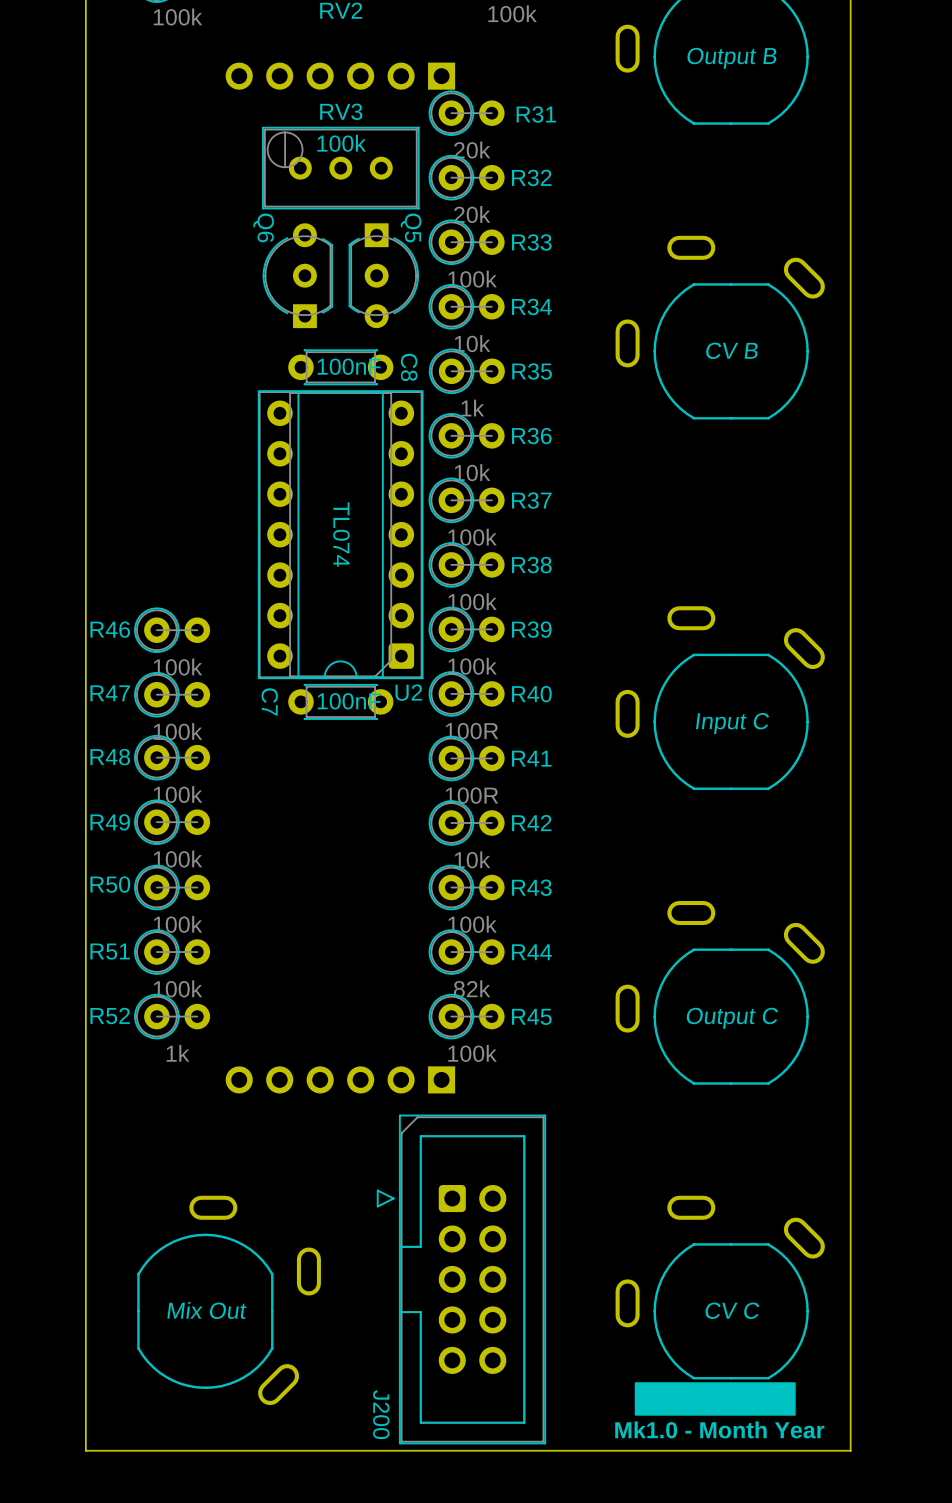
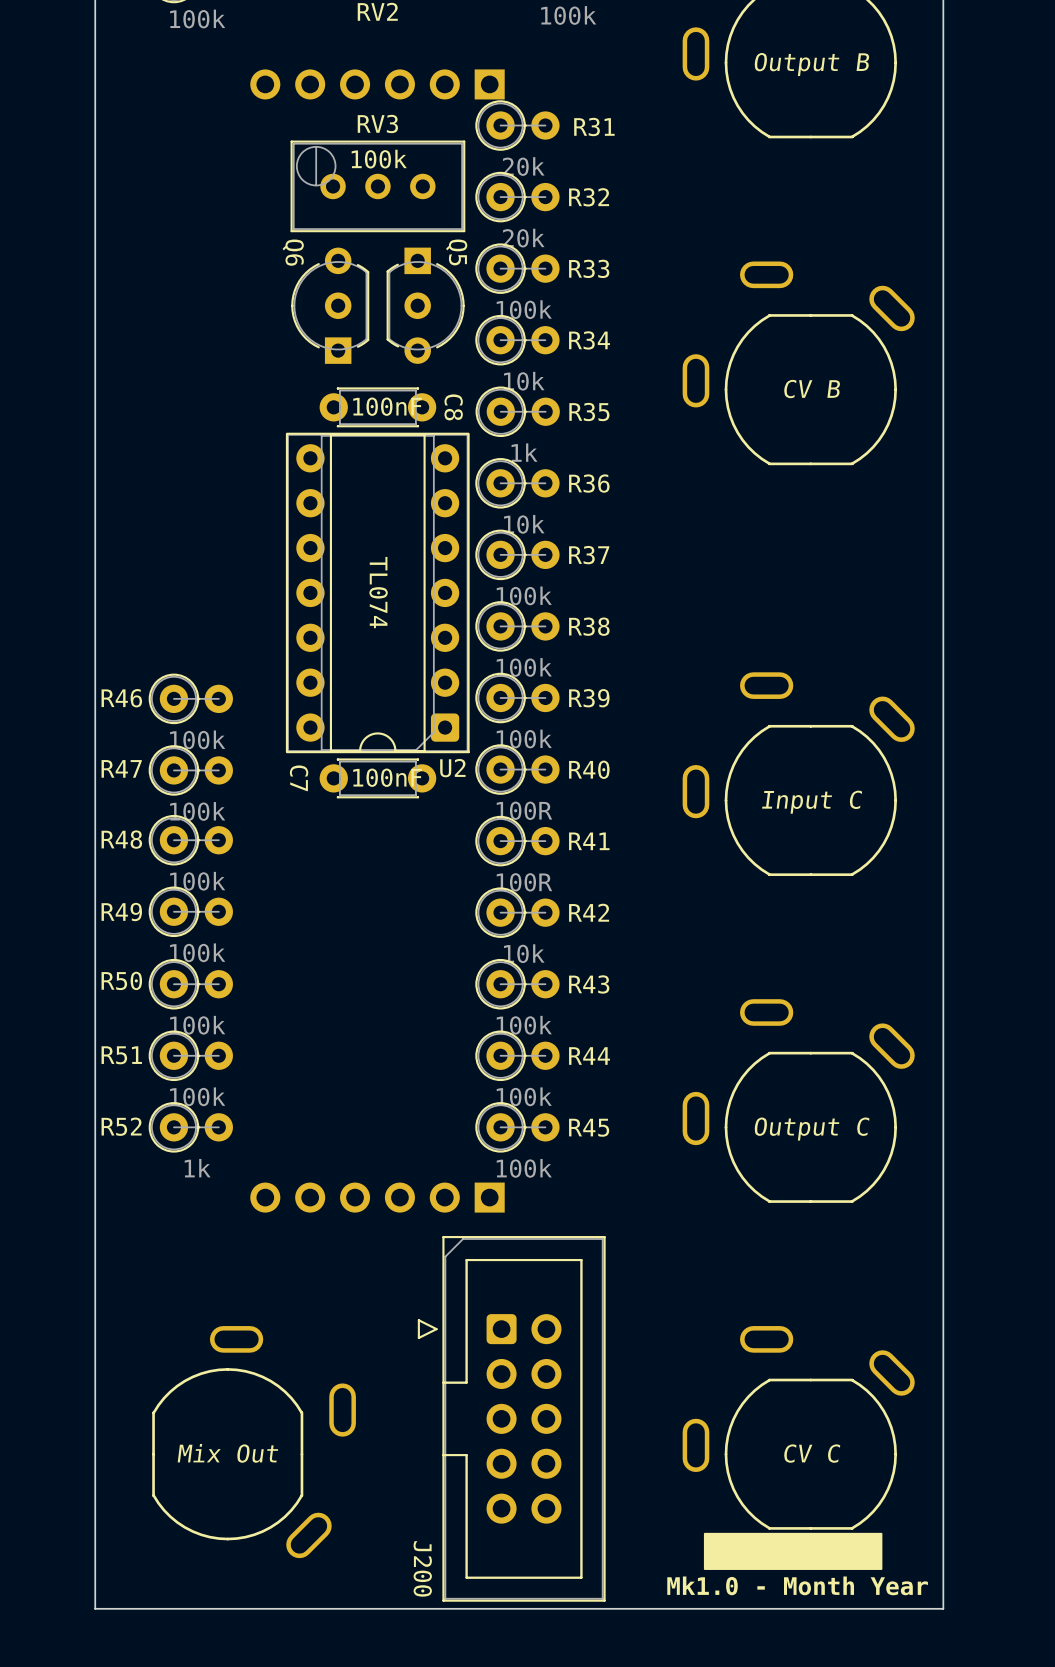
R44 value: 82k (472, 988) -> 100k (524, 1096)

